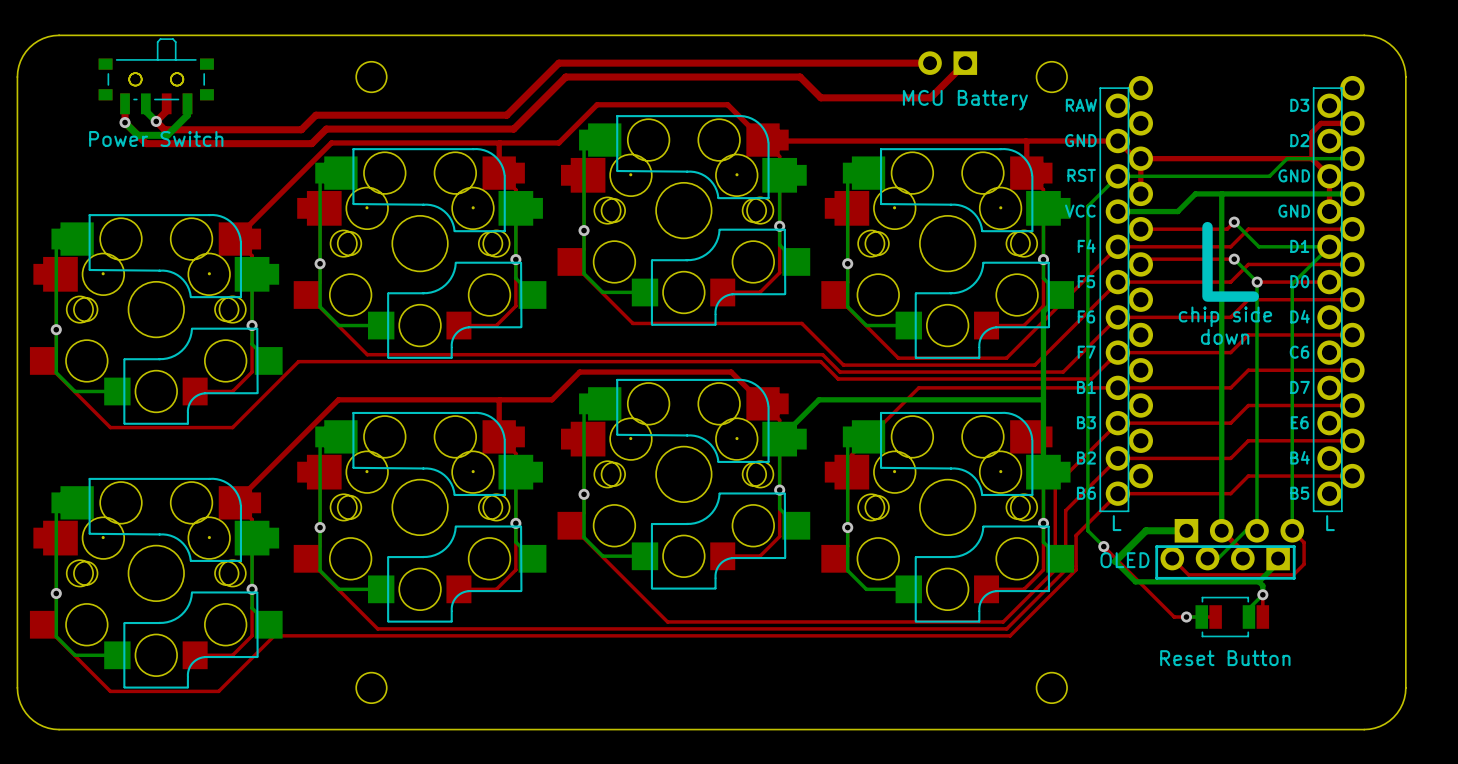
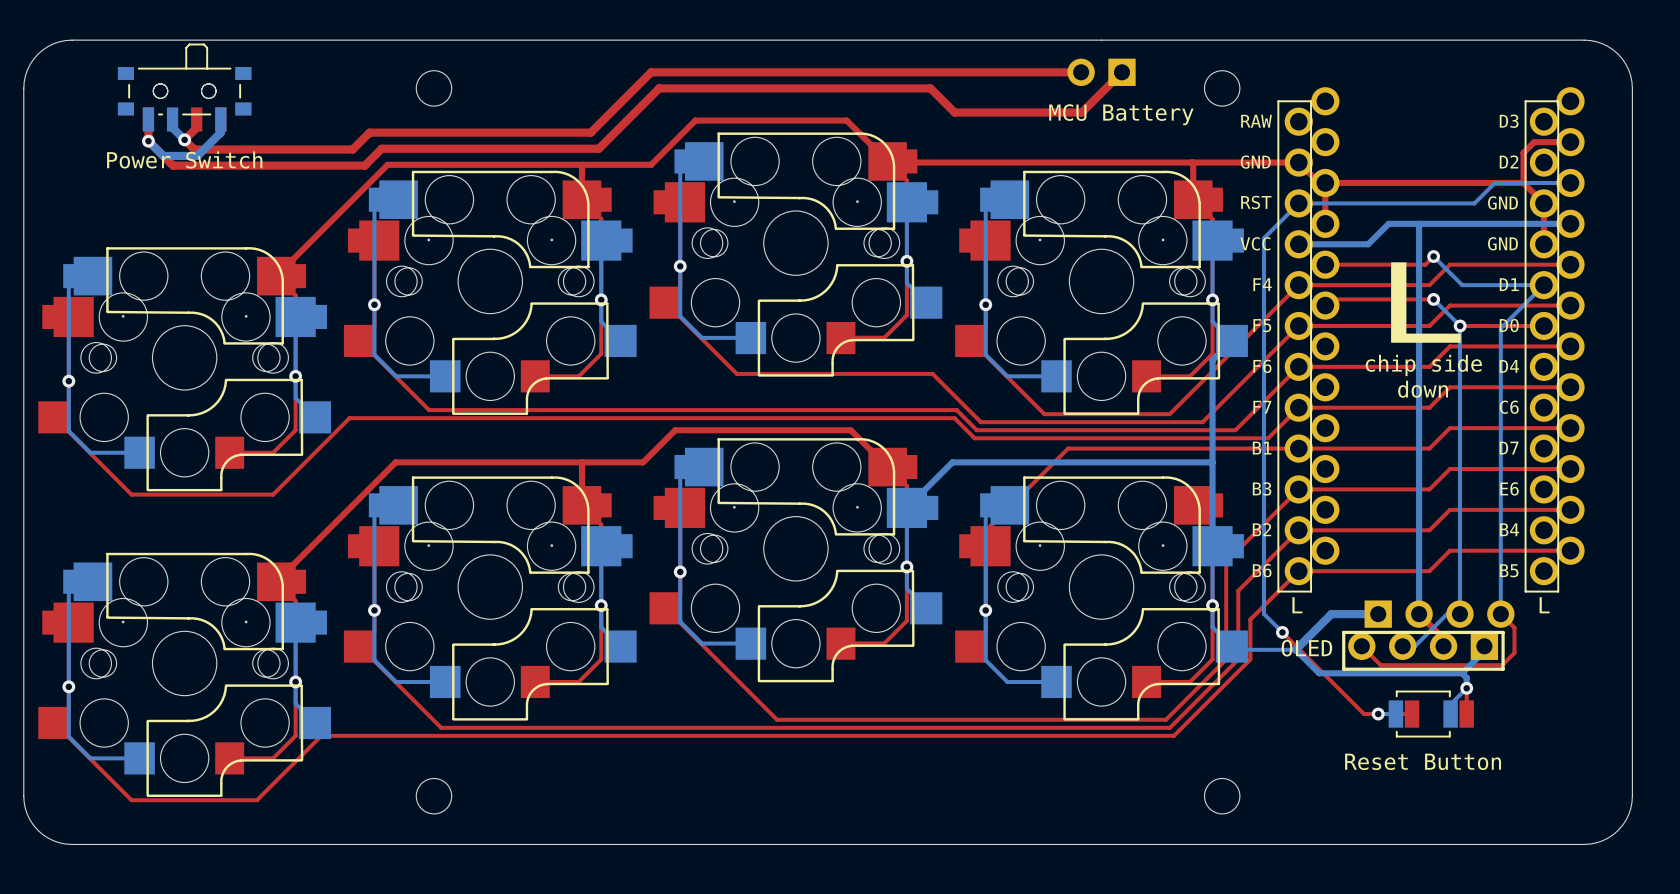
bottom track: none -> (1231, 646) (1235, 649) (1295, 649)

